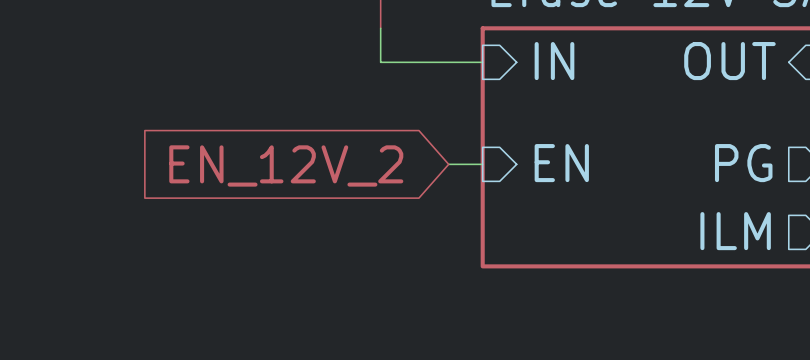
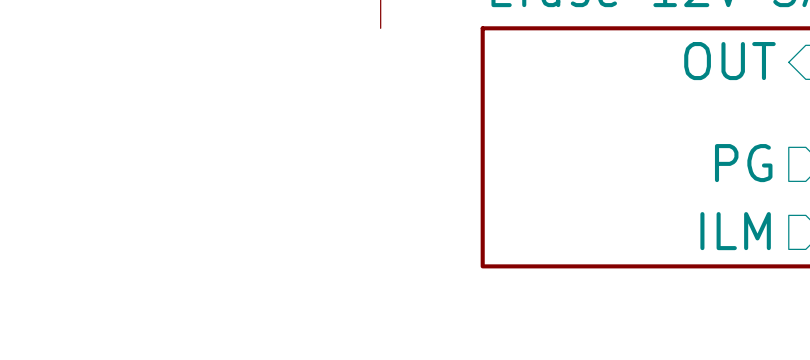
wire: (380, 28) (380, 62) (482, 62) -> none
sheet pin: IN (554, 61) -> none
sheet pin: EN (561, 163) -> none
wire: (448, 164) (482, 164) -> none
global label: EN_12V_2 (286, 165) -> none

